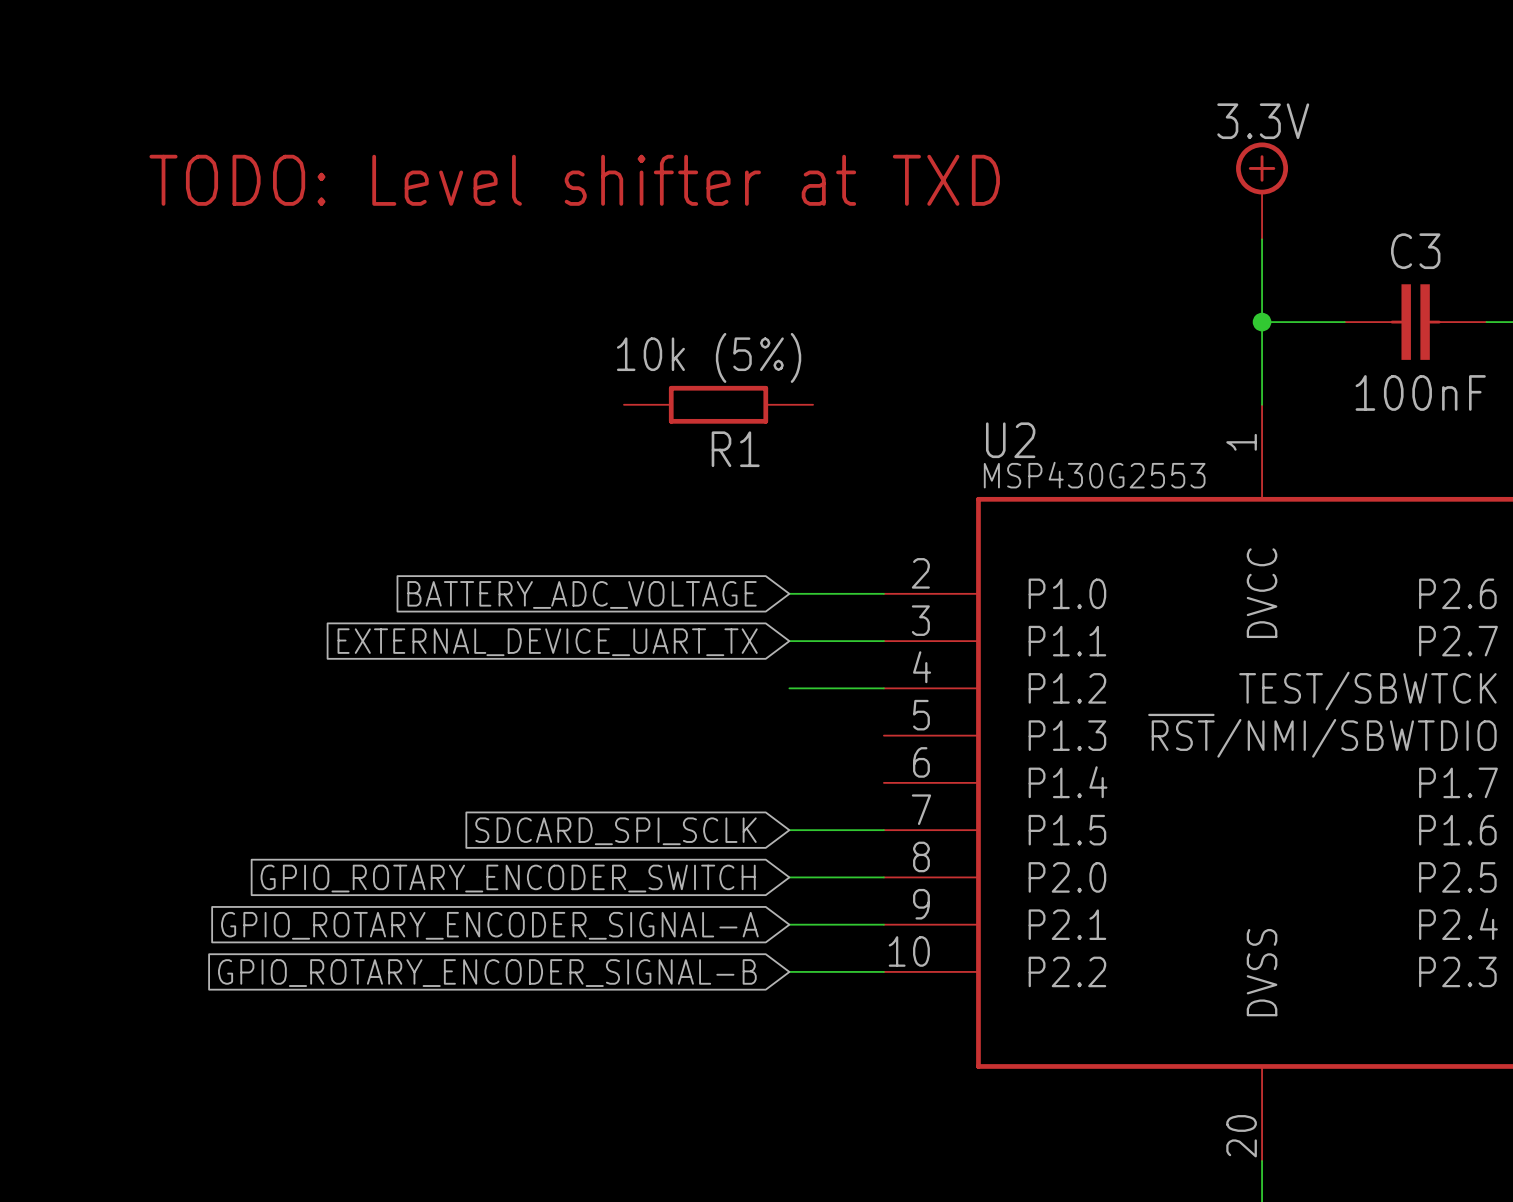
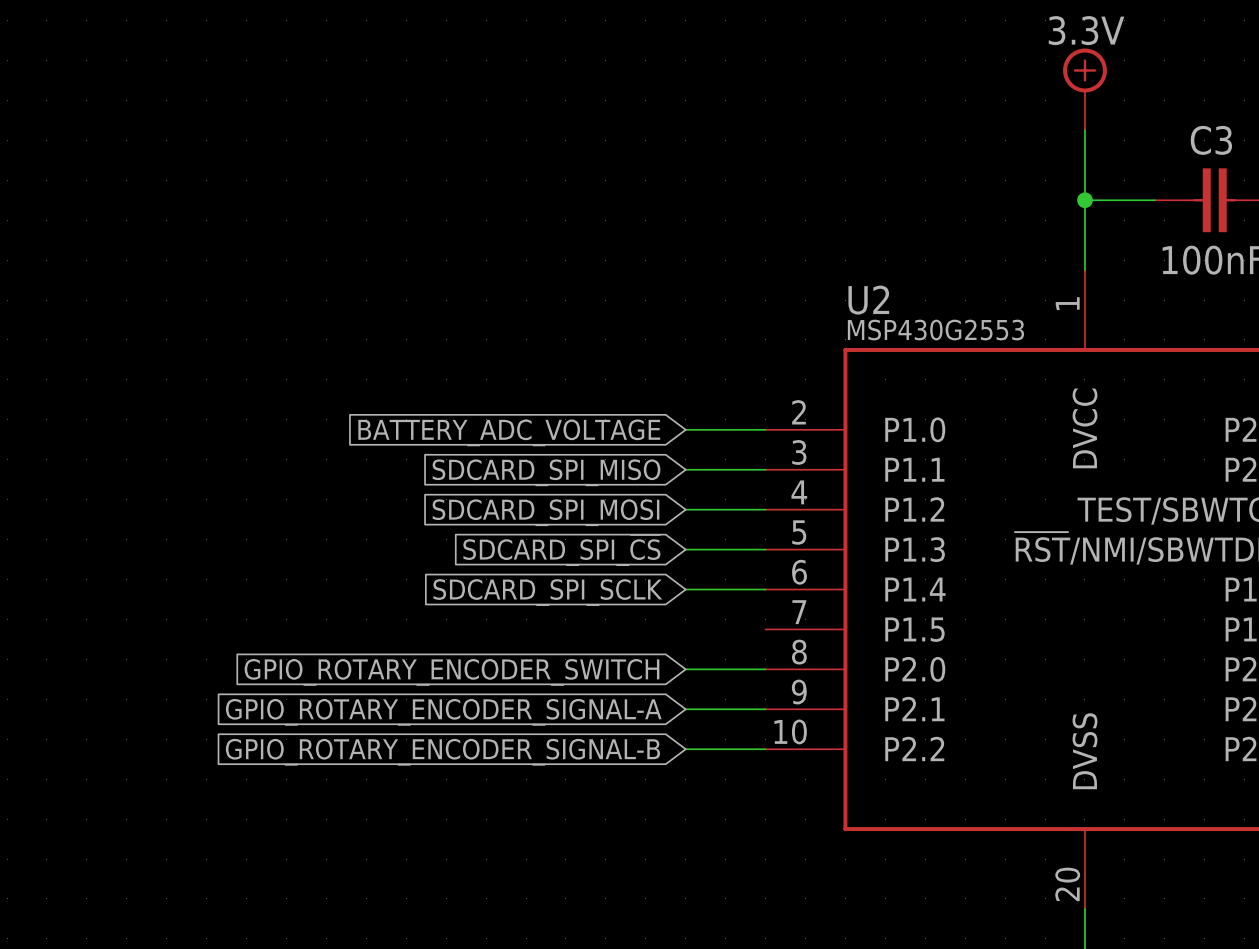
text: TODO: Level shifter at TXD (574, 180) -> none
R1: 10k (5%) (718, 404) -> none
global label: EXTERNAL_DEVICE_UART_TX (547, 642) -> SDCARD_SPI_MISO (546, 472)
global label: none -> SDCARD_SPI_MOSI (546, 512)
global label: none -> SDCARD_SPI_~{CS} (561, 550)
wire: none -> (685, 549) (765, 549)
wire: (789, 830) (883, 830) -> (685, 589) (765, 589)
global label position: SDCARD_SPI_SCLK (615, 831) -> SDCARD_SPI_SCLK (547, 592)

